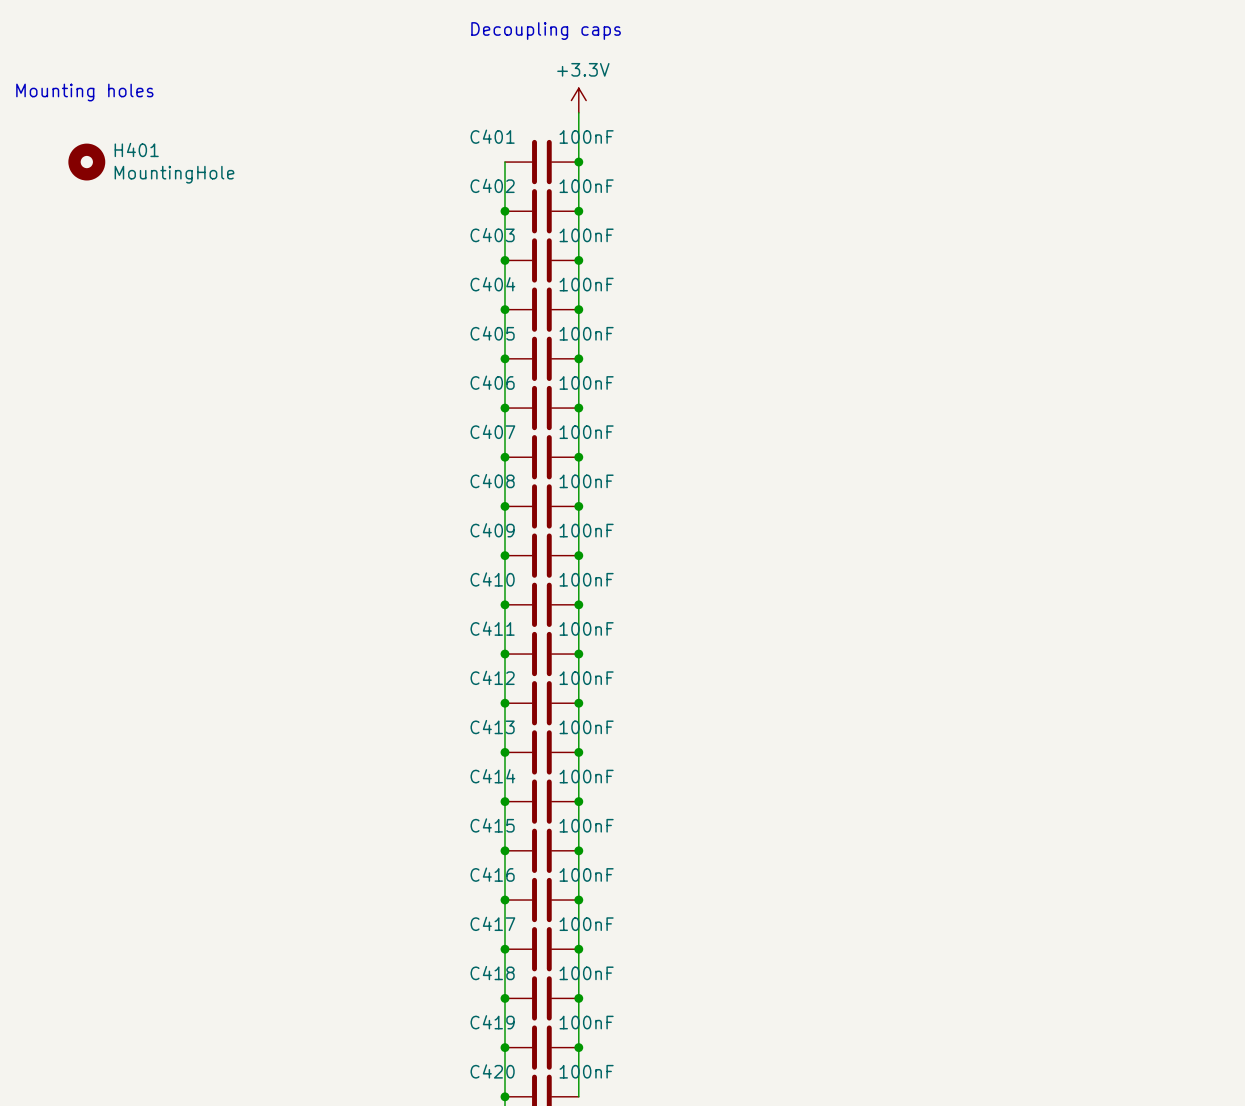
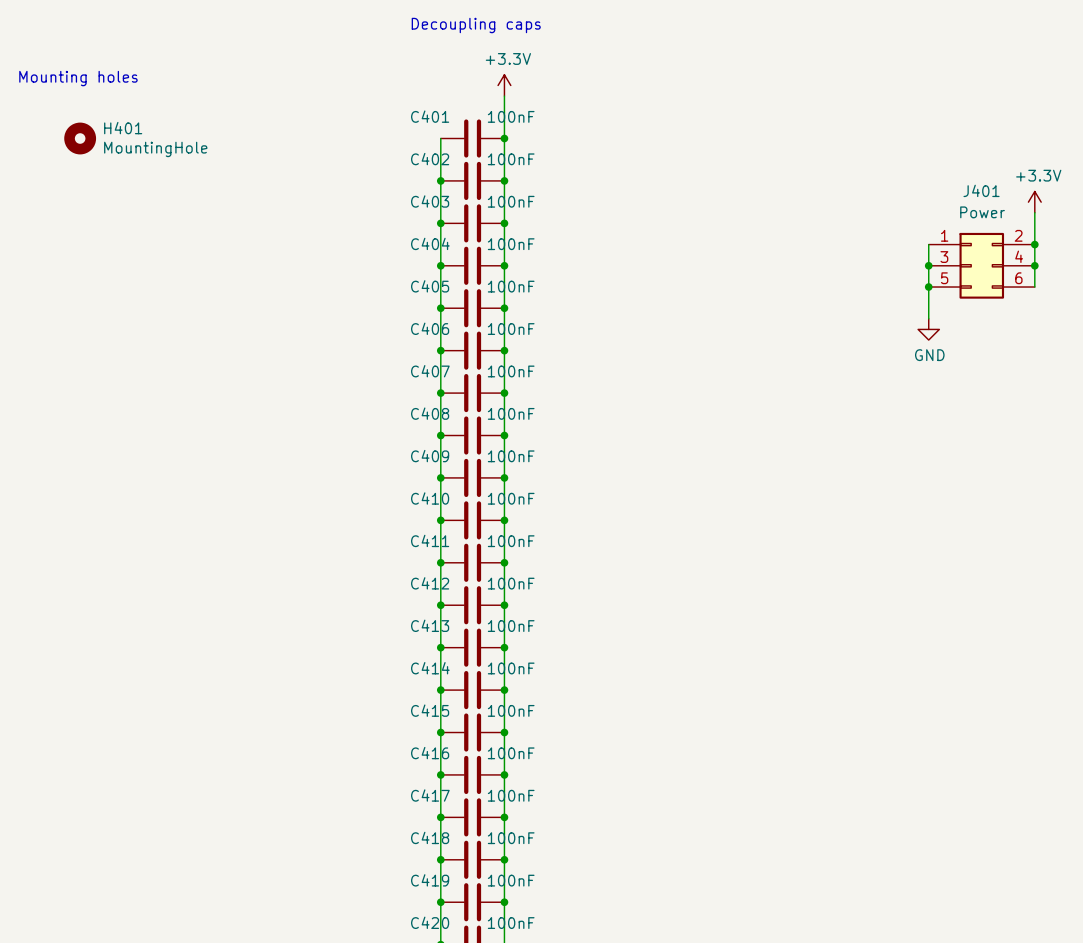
power symbol: none -> +3.3V (1034, 202)
wire: none -> (1034, 212) (1034, 287)
wire: none -> (928, 244) (928, 318)
junction: none -> (1034, 244)
junction: none -> (928, 265)
J401: none -> Power (981, 265)
junction: none -> (1034, 265)
junction: none -> (928, 287)
power symbol: none -> GND (928, 329)

